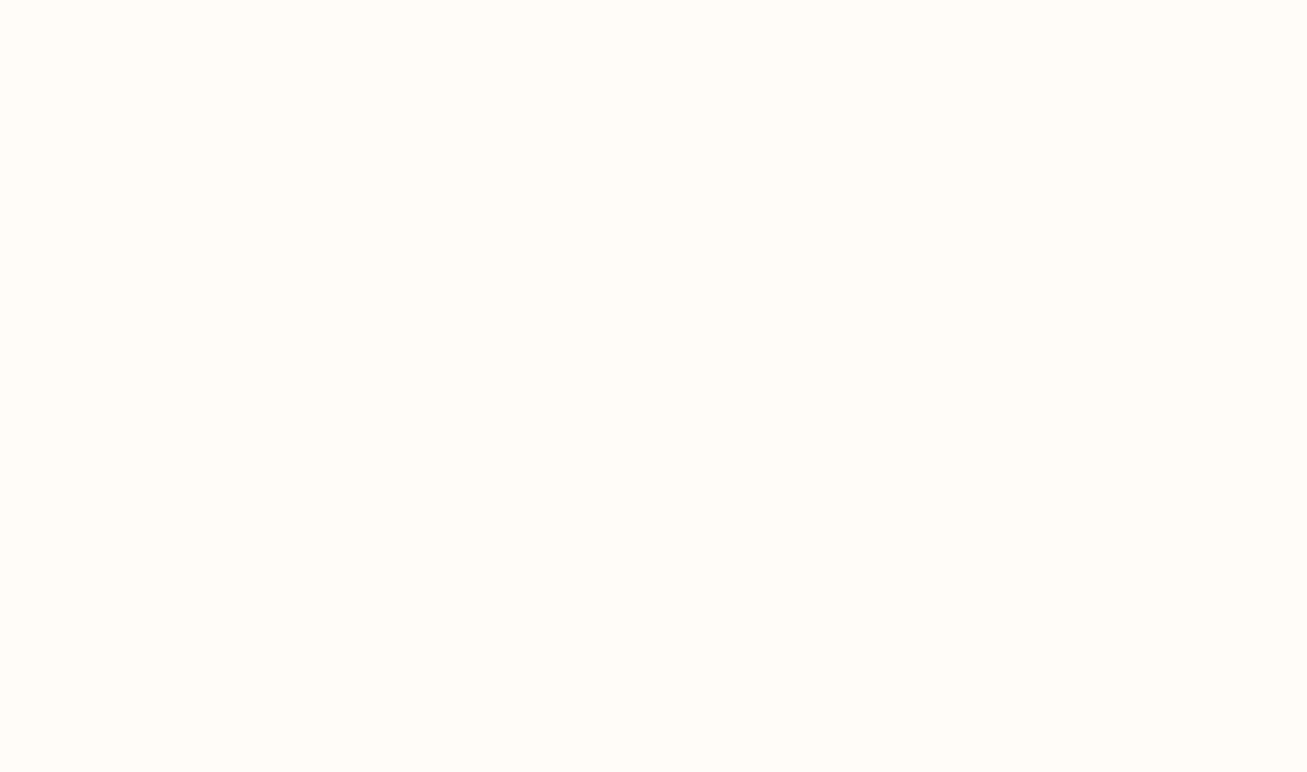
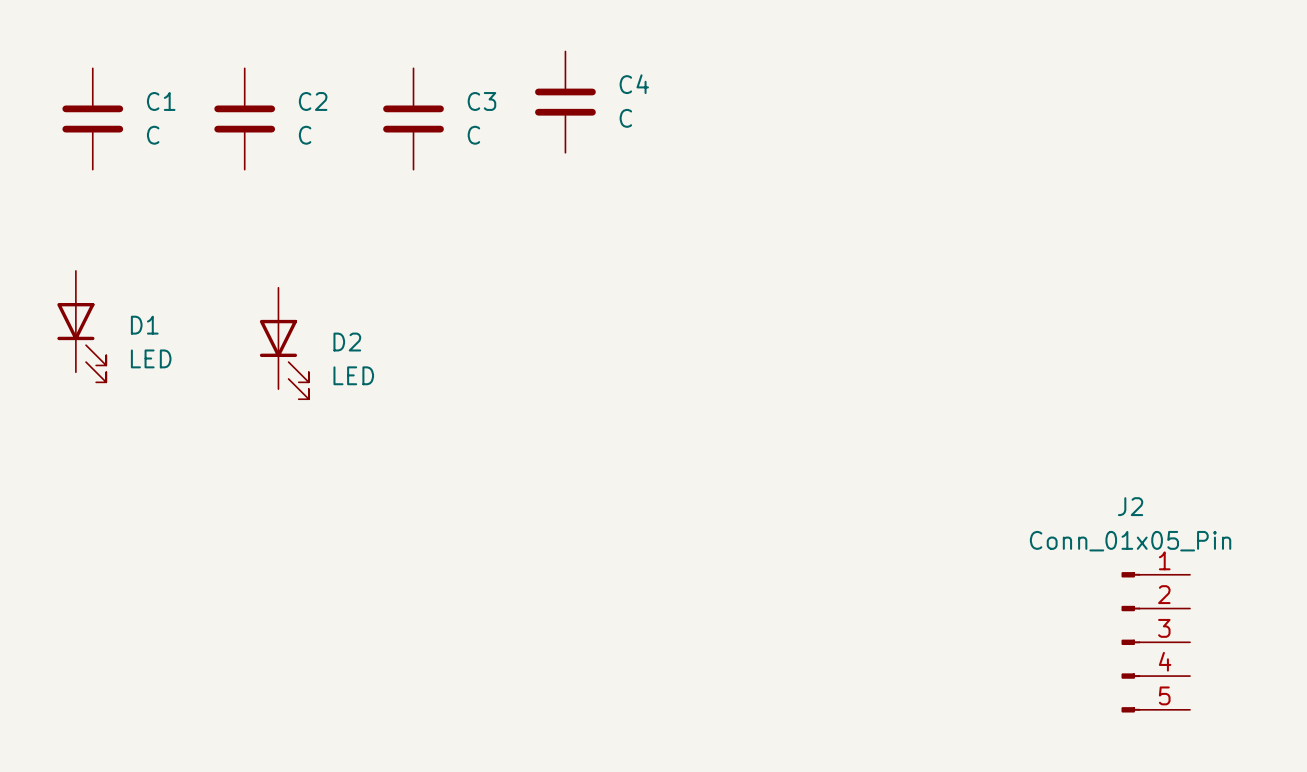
C4: none -> C (565, 102)
C1: none -> C (92, 118)
C2: none -> C (244, 118)
C3: none -> C (413, 118)
D1: none -> LED (81, 326)
D2: none -> LED (284, 343)
J2: none -> Conn_01x05_Pin (1155, 642)

